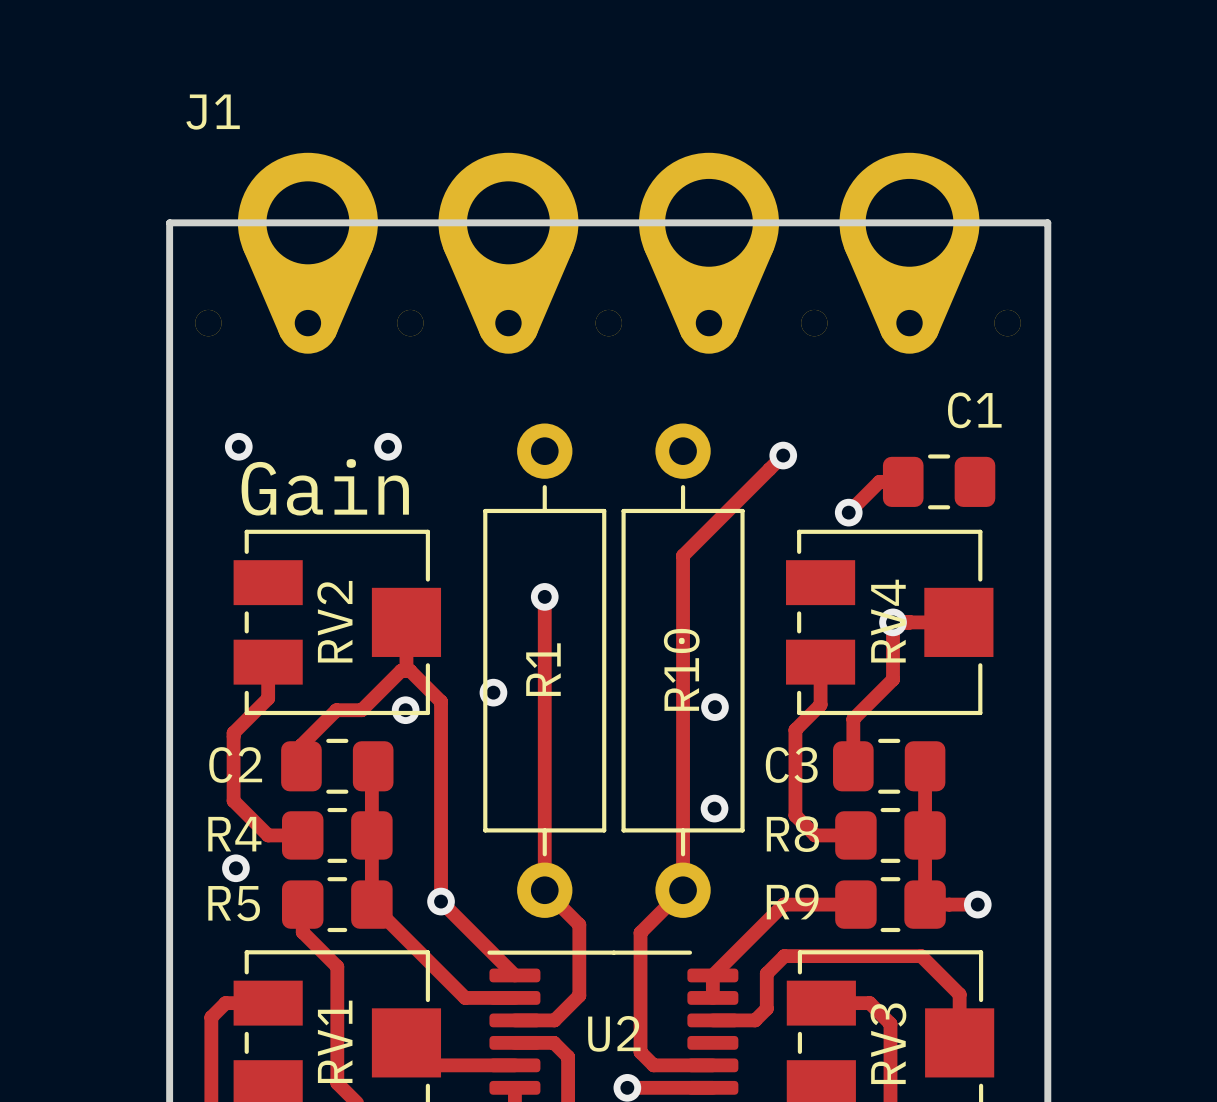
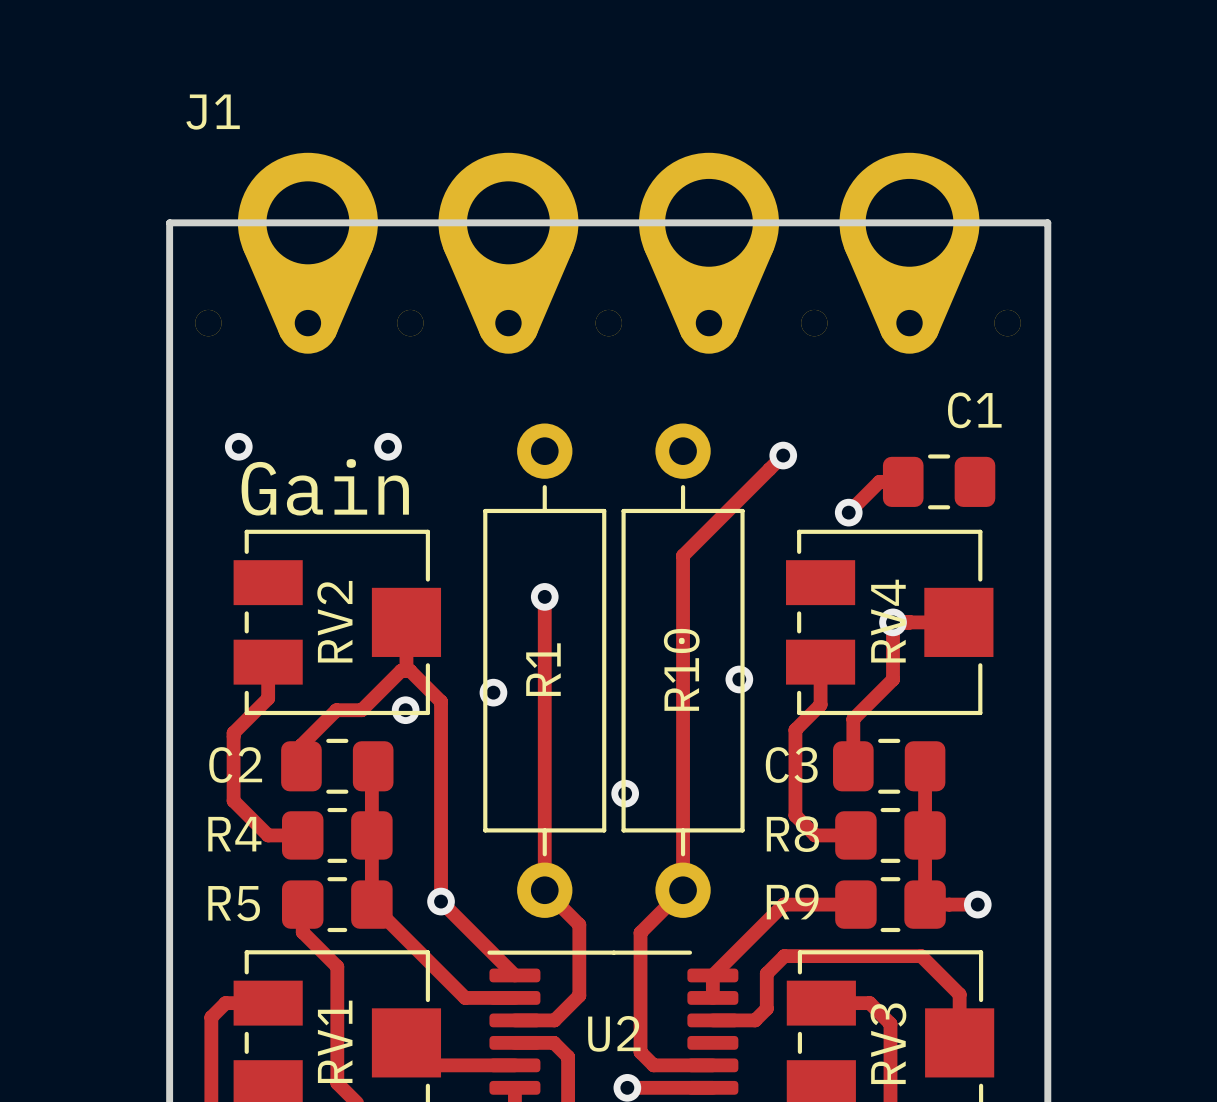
via position: (714, 707) -> (739, 679)
via: none -> (625, 793)
via: (714, 808) -> none
via: (235, 868) -> none

